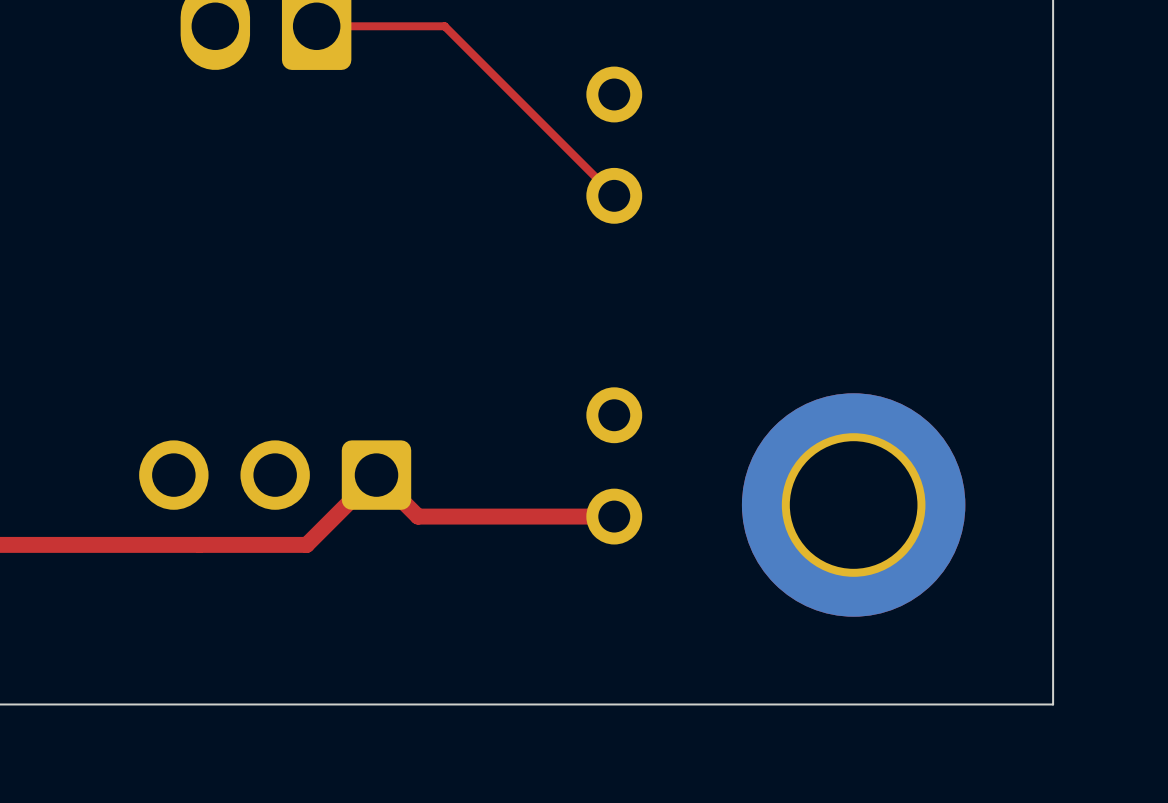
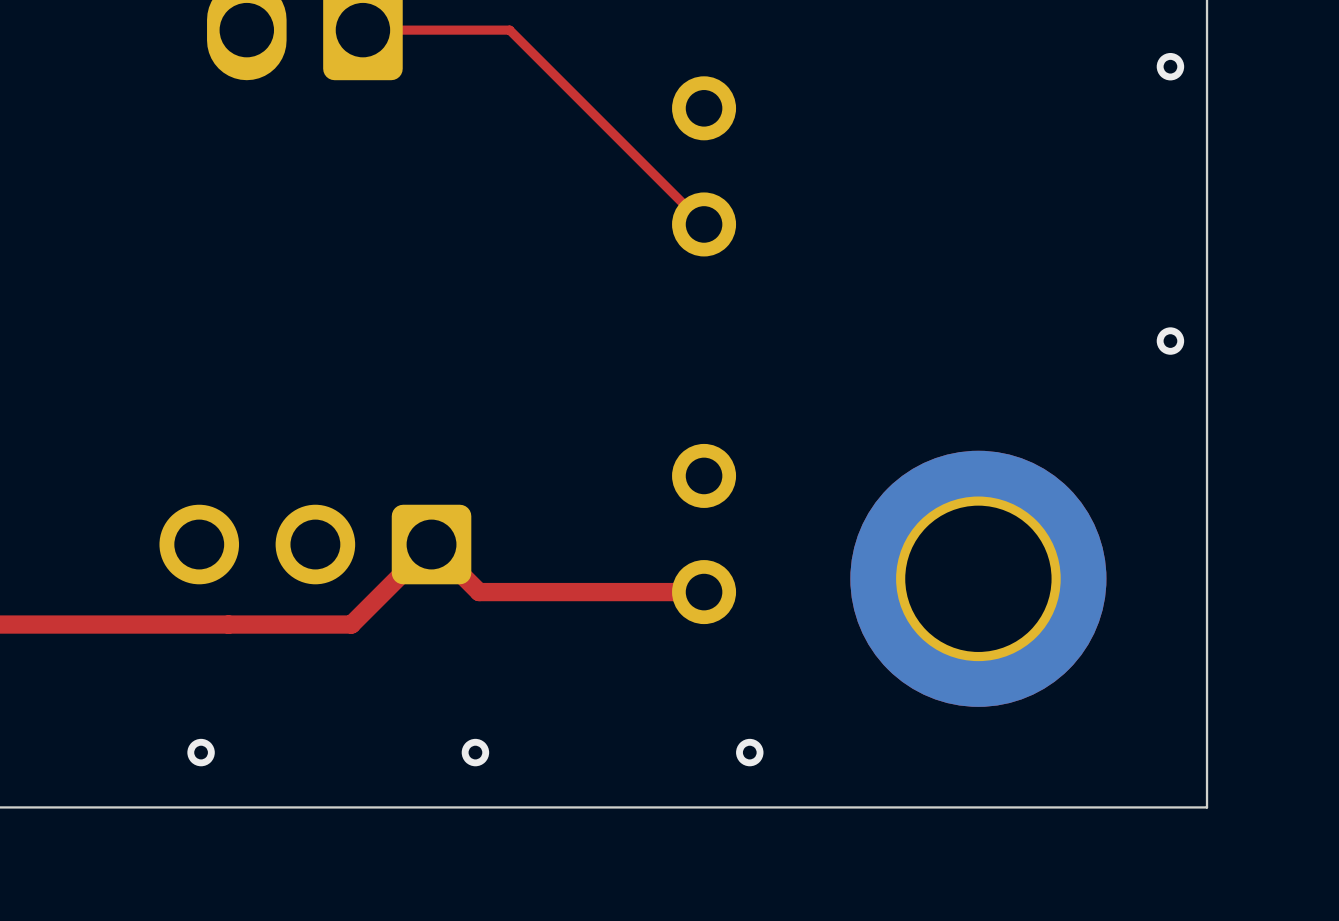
via: none -> (1170, 66)
via: none -> (1170, 341)
via: none -> (201, 752)
via: none -> (475, 752)
via: none -> (749, 752)

